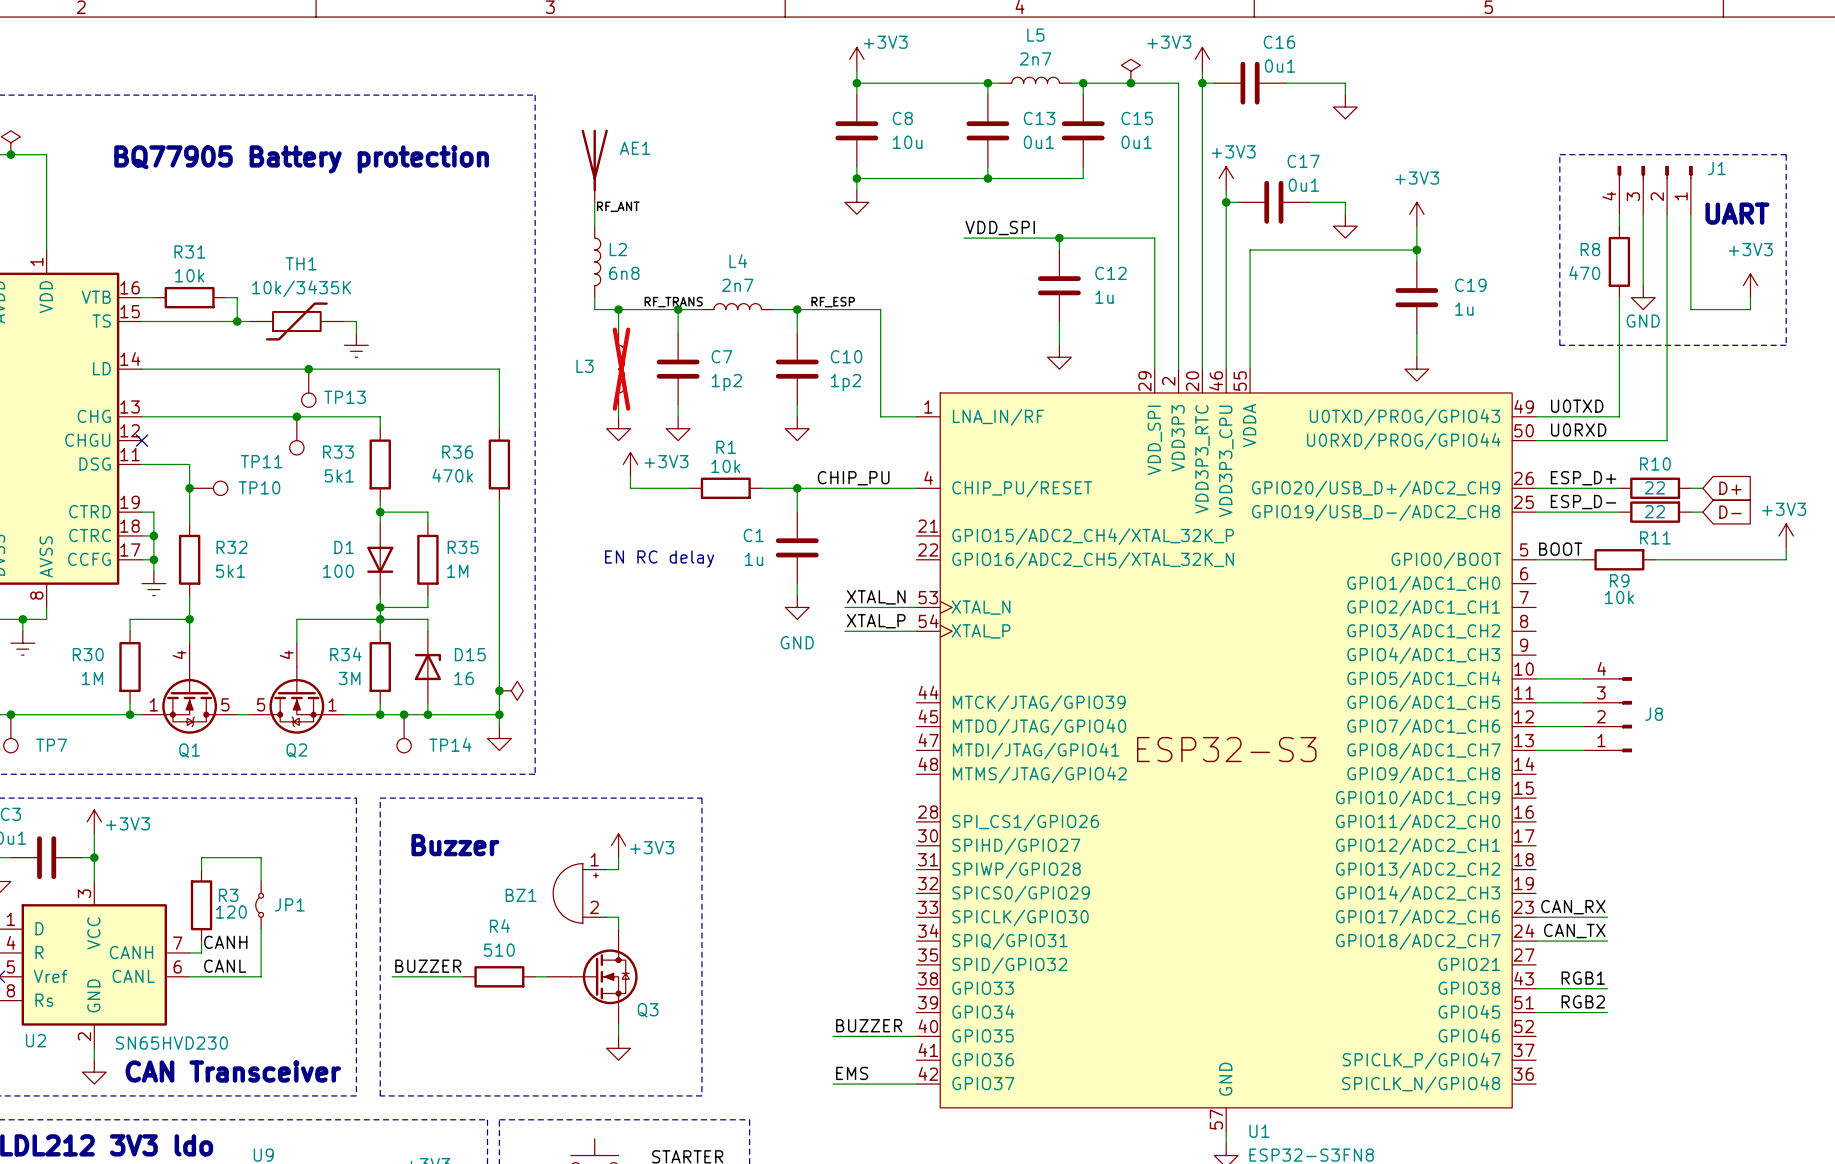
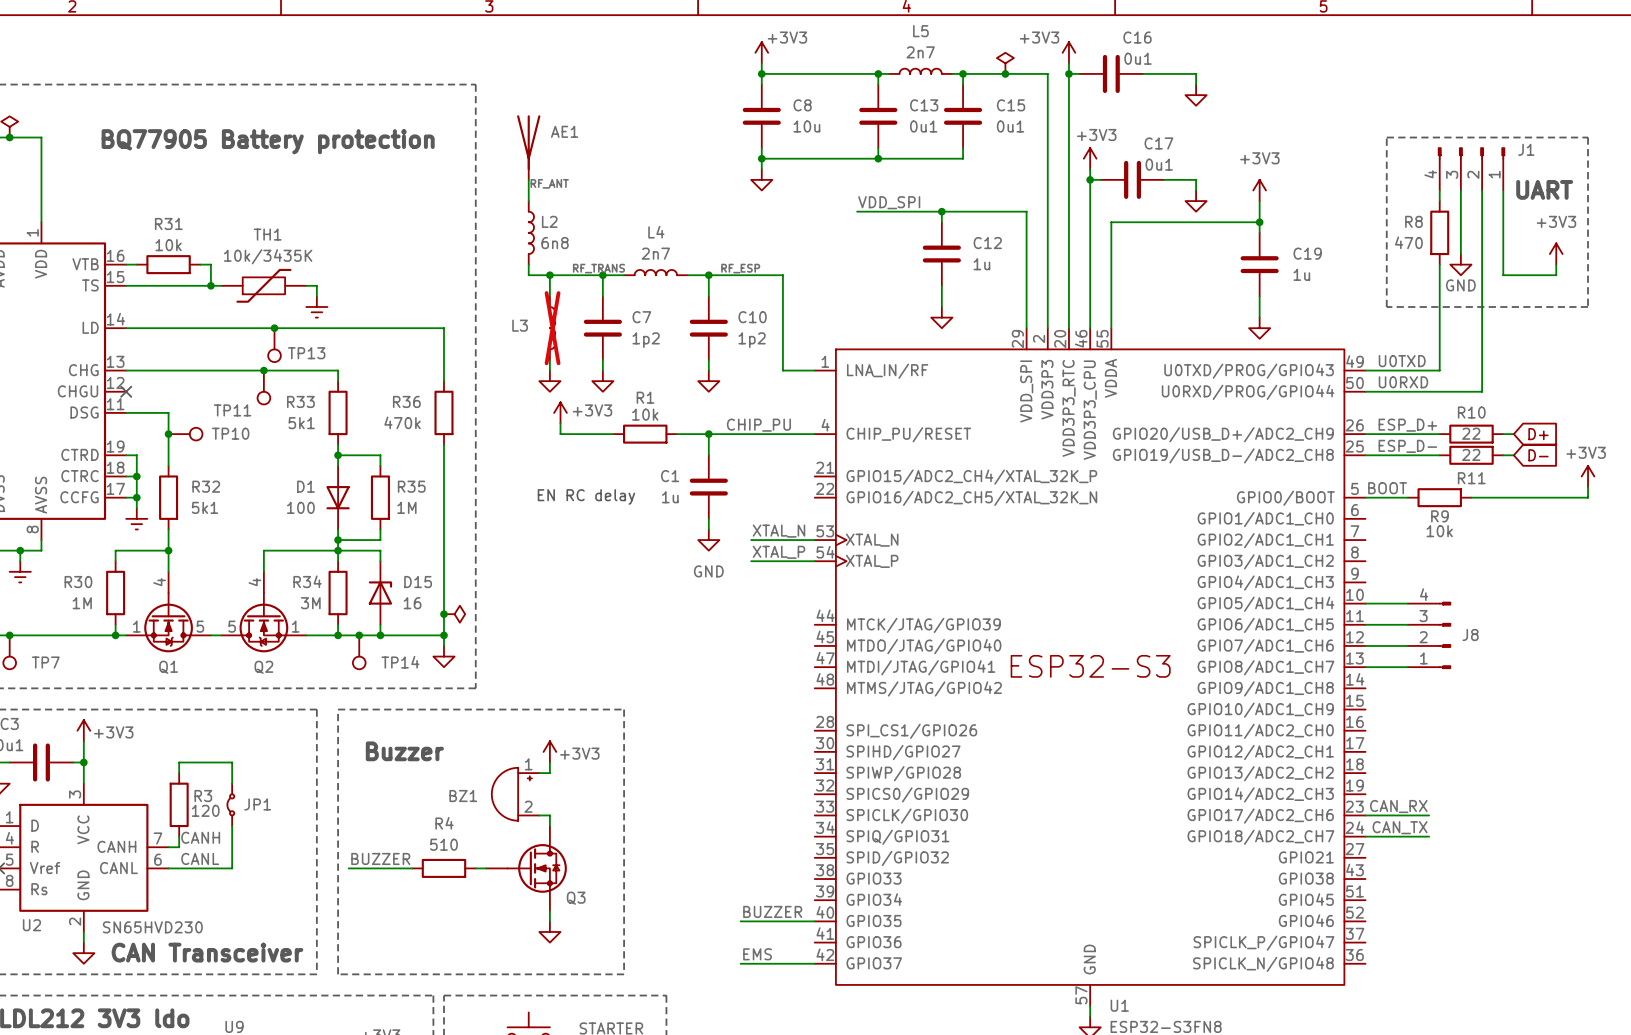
label: RGB1 (1583, 978) -> none
wire: (1536, 988) (1607, 988) -> none
label: RGB2 (1583, 1001) -> none
wire: (1536, 1012) (1607, 1012) -> none

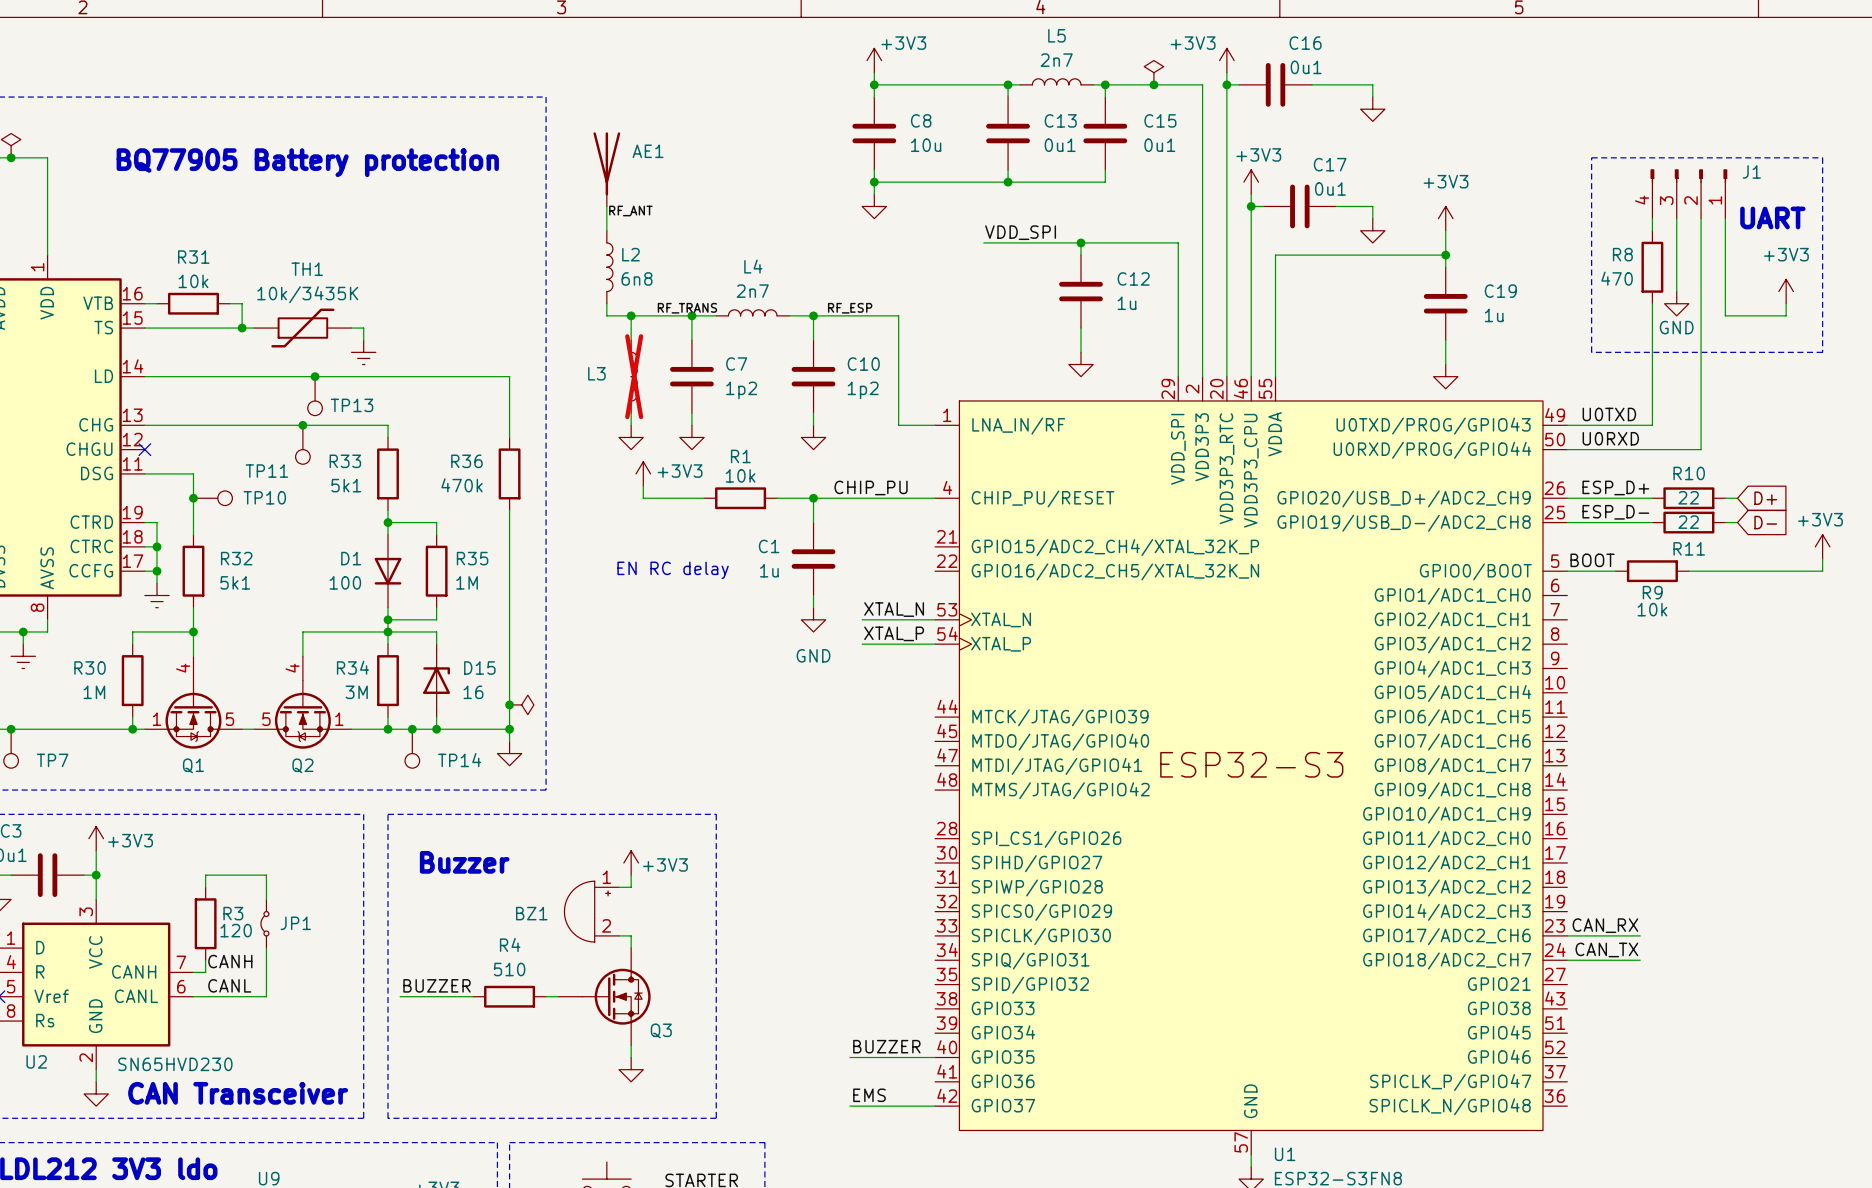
wire: (1365, 603) (1407, 603) -> none
wire: (1365, 624) (1407, 624) -> none
J8: (1429, 635) -> none
wire: (1365, 645) (1407, 645) -> none
wire: (1365, 667) (1407, 667) -> none

